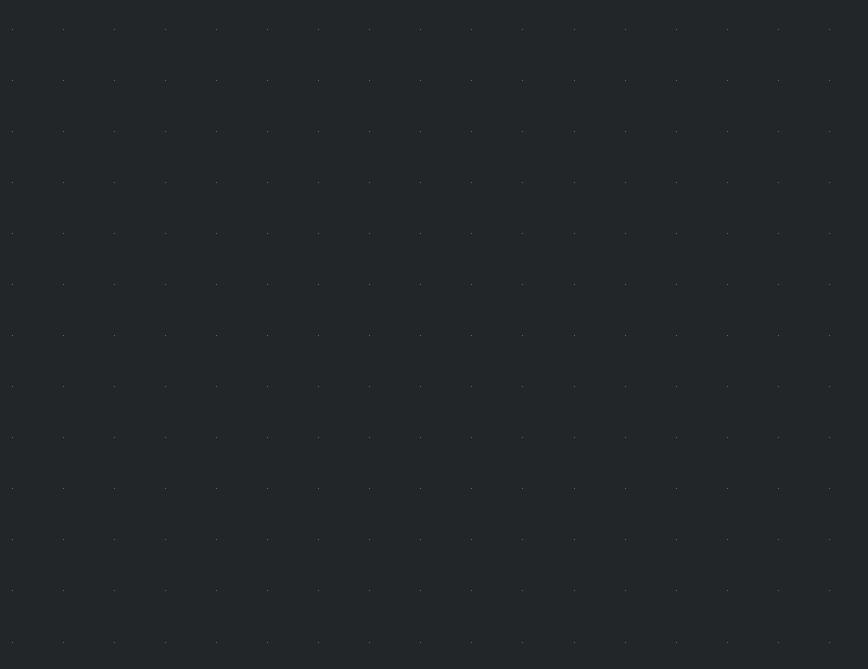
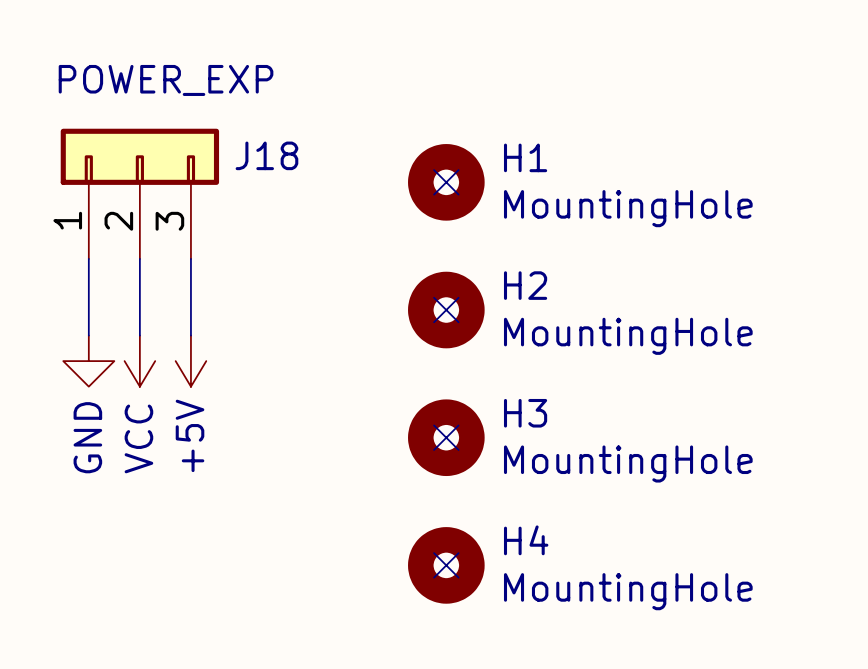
H1: none -> MountingHole (446, 182)
no-connect mark: none -> (446, 182)
J18: none -> POWER_EXP (139, 193)
wire: none -> (88, 258) (88, 335)
wire: none -> (139, 258) (139, 335)
wire: none -> (190, 258) (190, 335)
H2: none -> MountingHole (446, 310)
no-connect mark: none -> (446, 310)
power symbol: none -> GND (88, 361)
power symbol: none -> VCC (139, 361)
power symbol: none -> +5V (190, 361)
H3: none -> MountingHole (446, 437)
no-connect mark: none -> (446, 437)
H4: none -> MountingHole (446, 565)
no-connect mark: none -> (446, 565)

